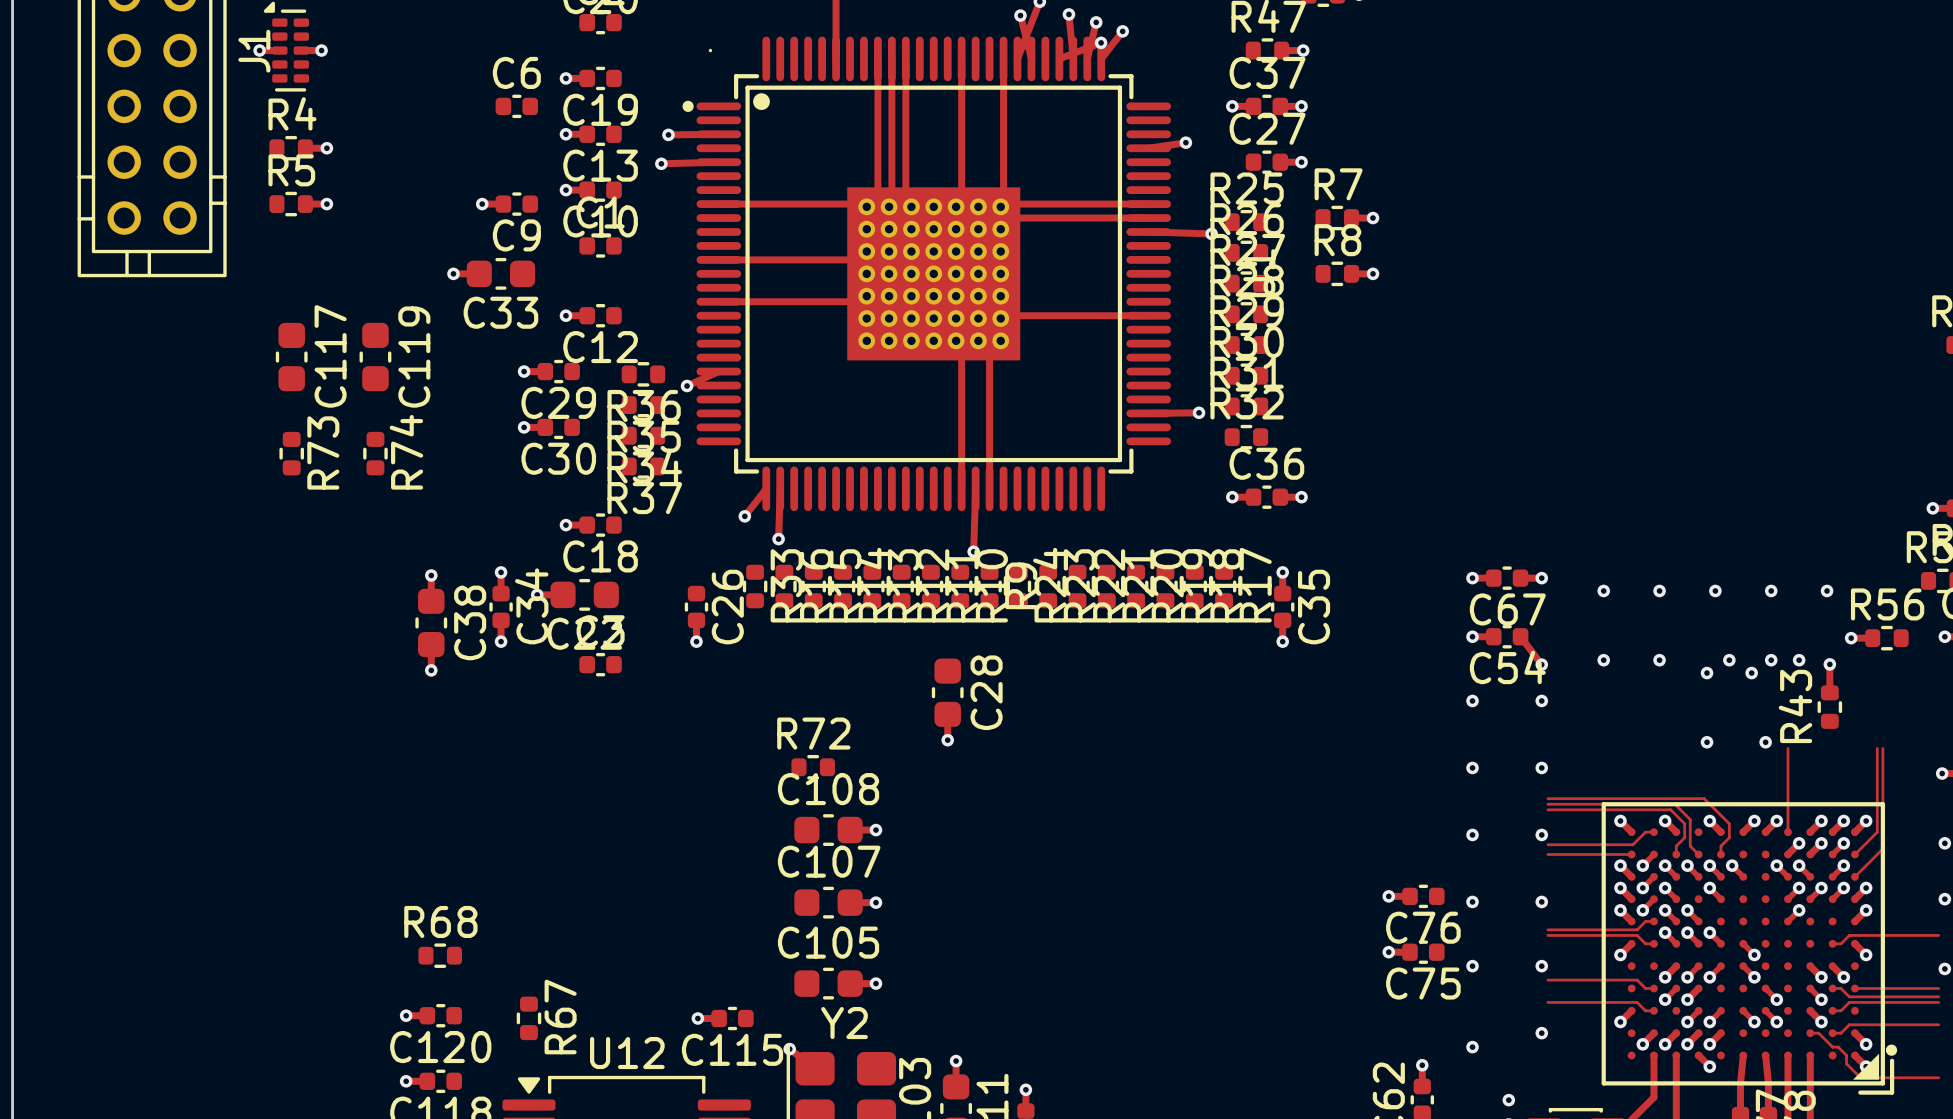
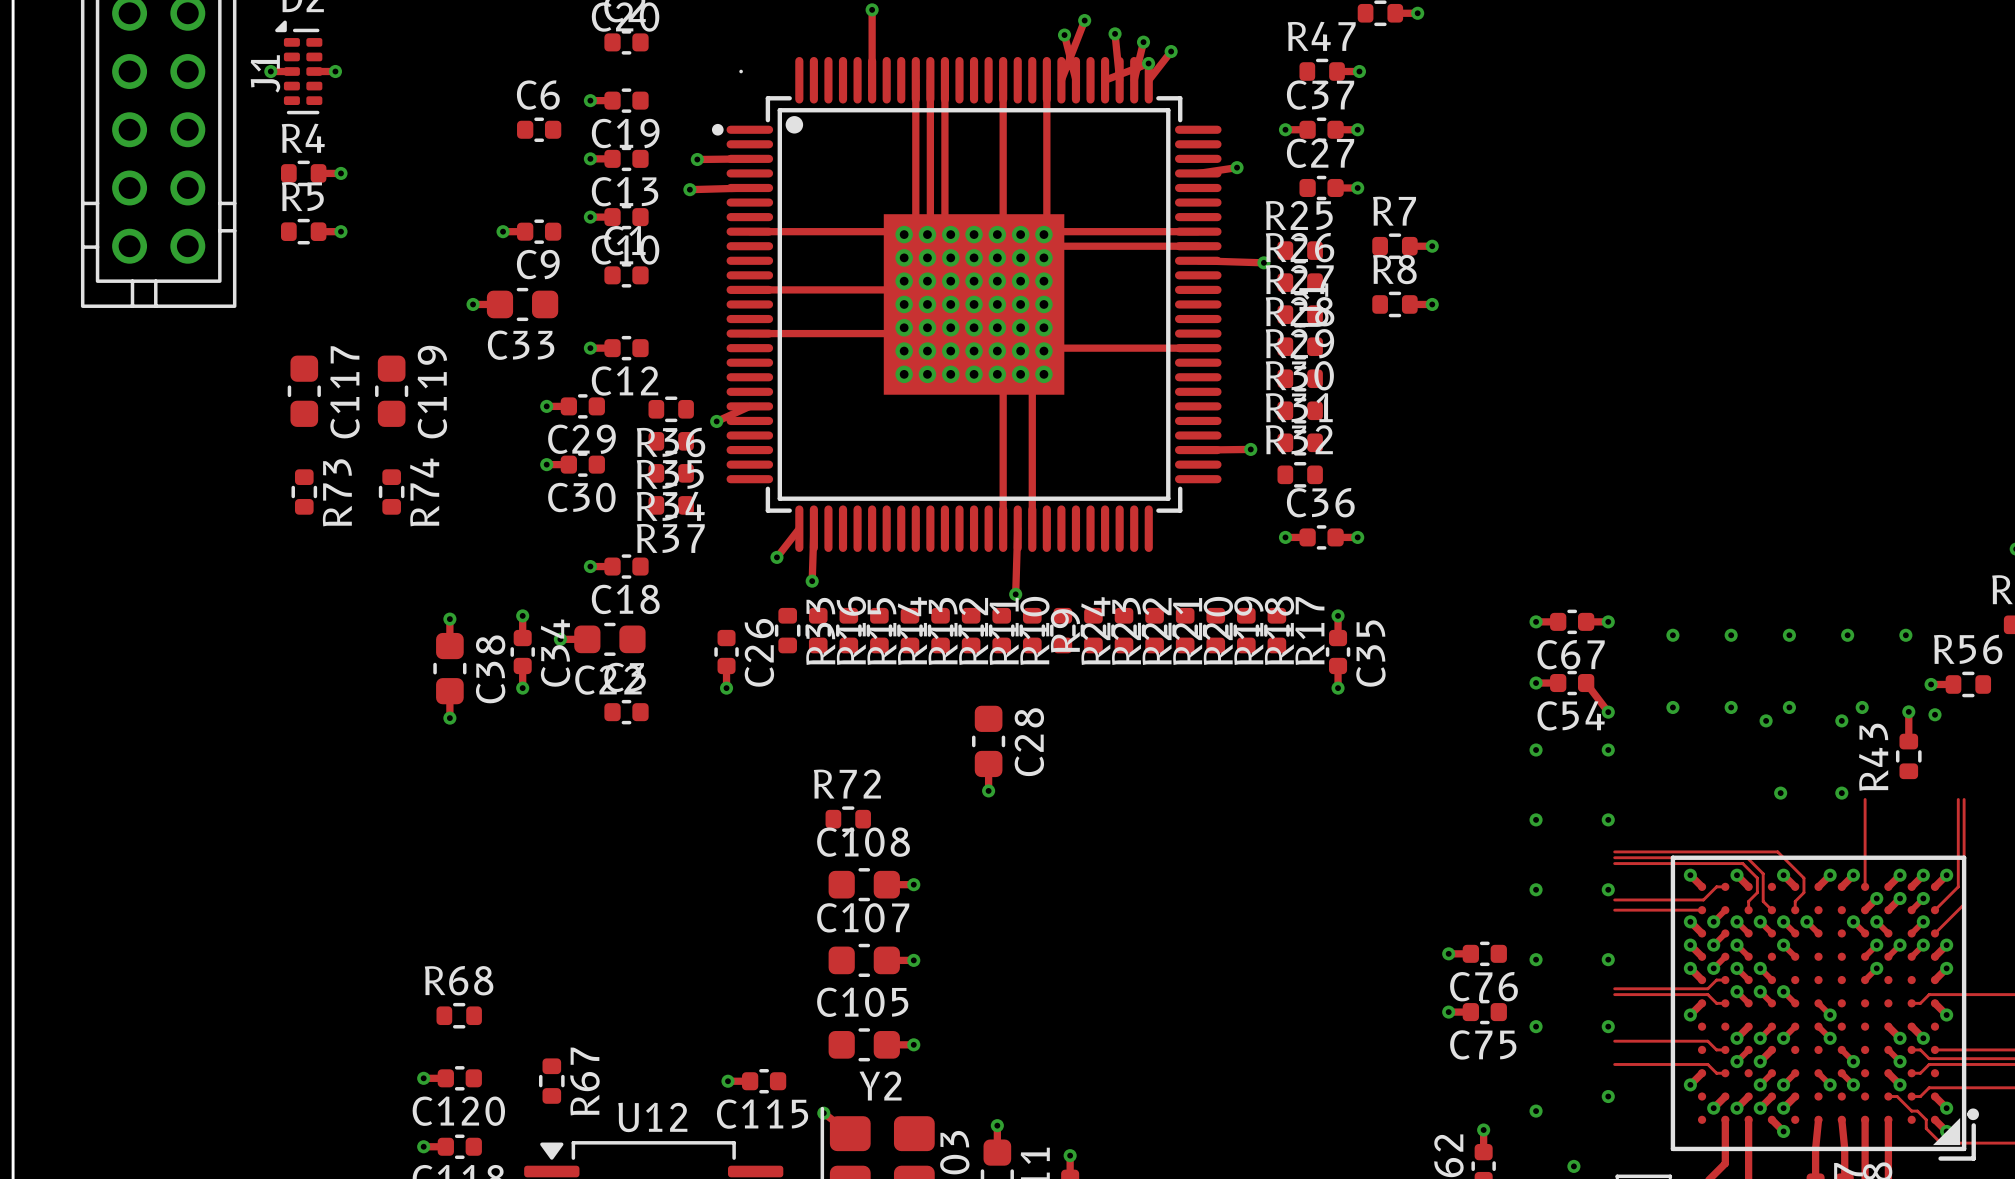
via: none -> (1789, 707)
via: (1729, 660) -> none
via: (1771, 660) -> none
via: none -> (1862, 707)
via: (1799, 660) -> none
via: none -> (1935, 714)
via: none -> (1766, 720)
via: (1707, 673) -> none
via: (1751, 673) -> none
via: none -> (1841, 720)

